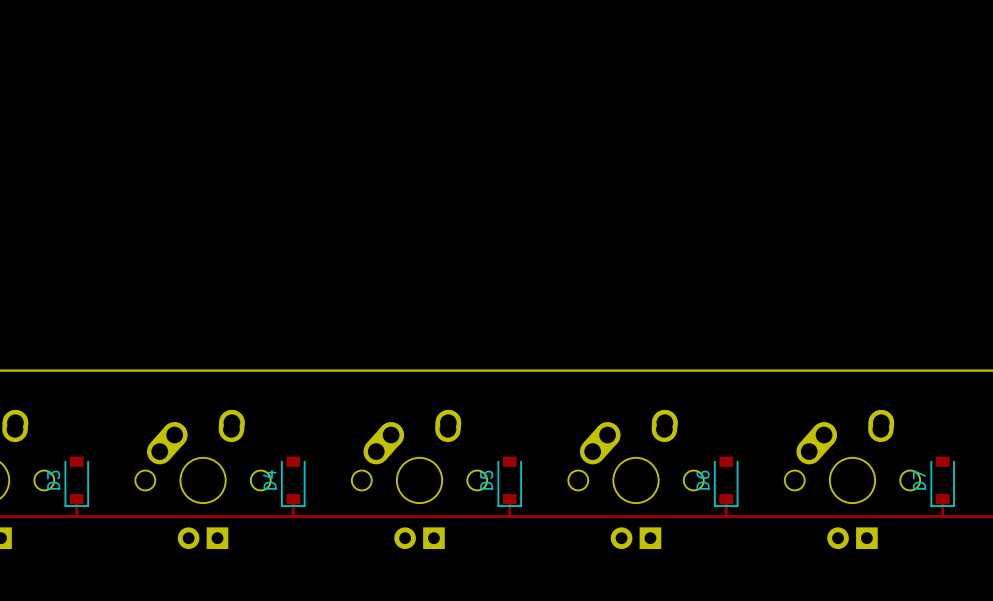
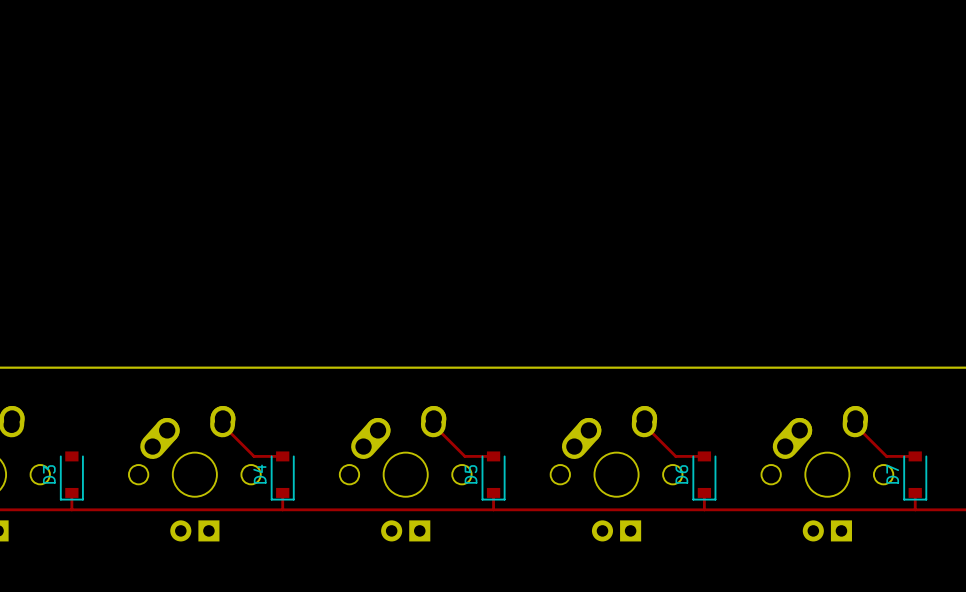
track: none -> (222, 424) (254, 456) (282, 456)
track: none -> (433, 424) (464, 456) (493, 456)
track: none -> (644, 424) (675, 456) (704, 456)
track: none -> (855, 424) (886, 456) (915, 456)

